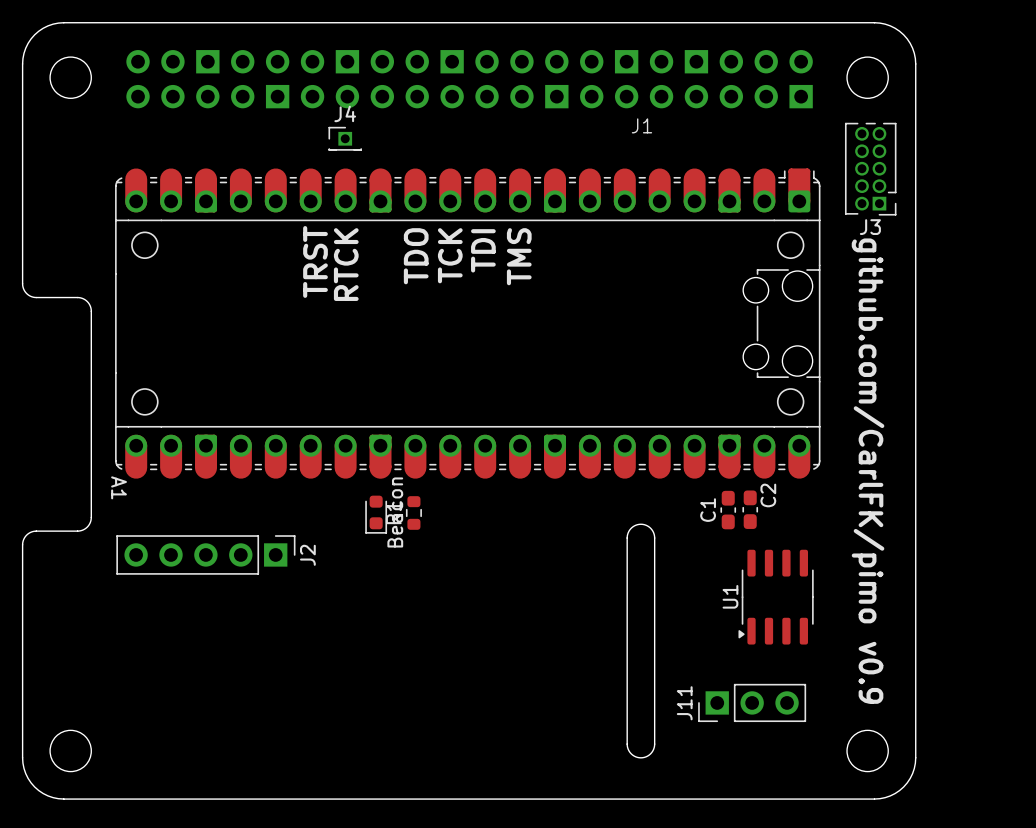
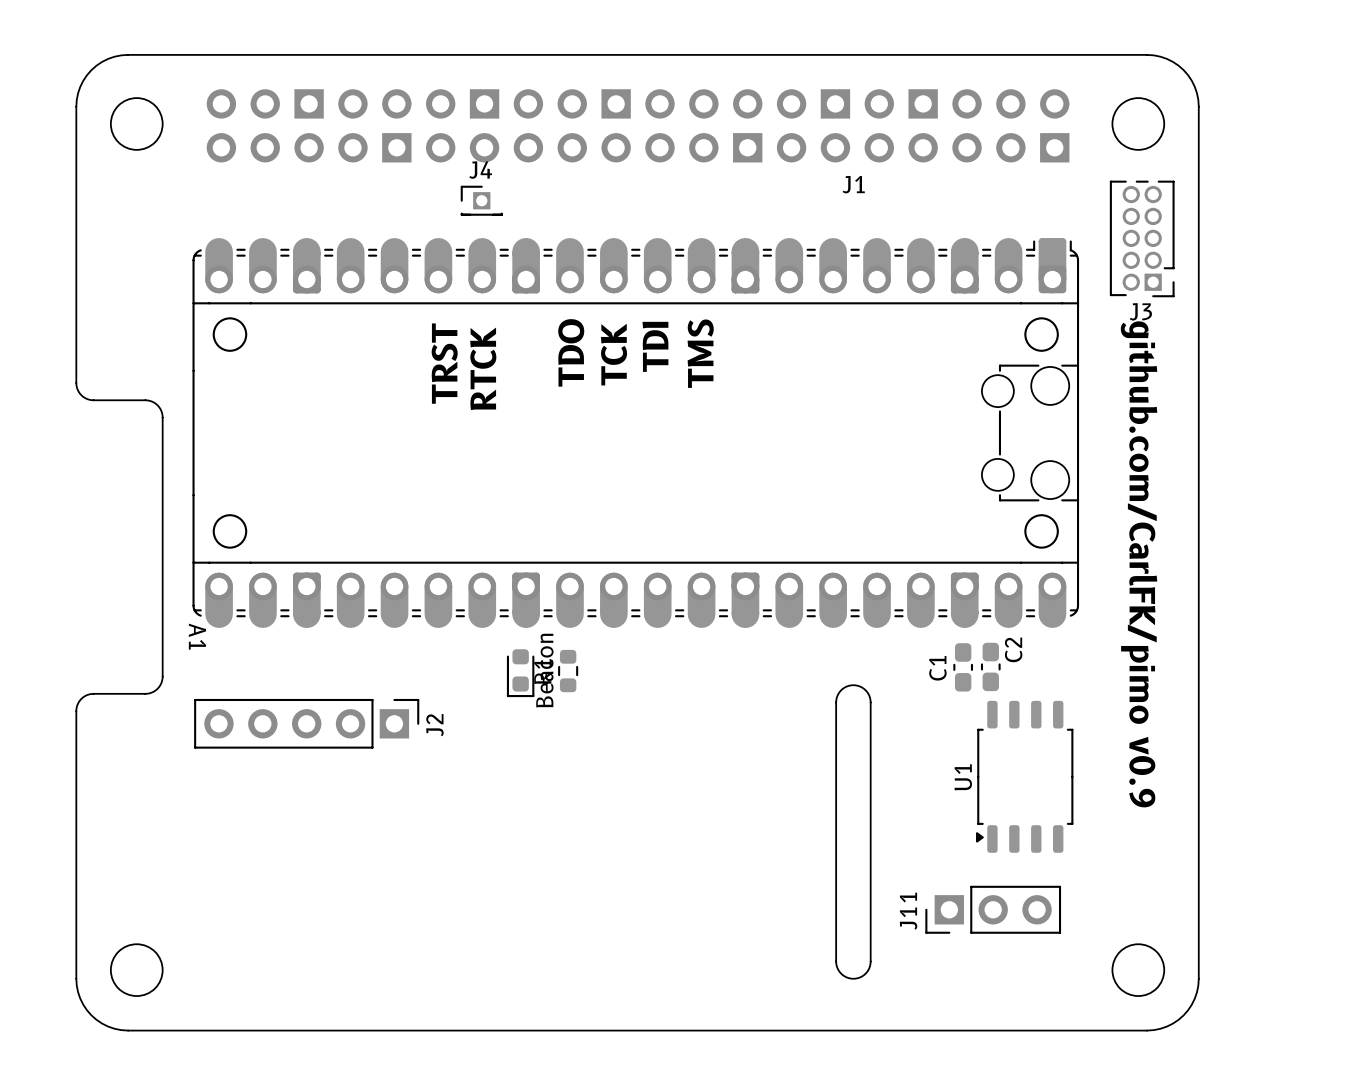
U1 footprint: [738, 549, 814, 645] -> [976, 700, 1074, 853]

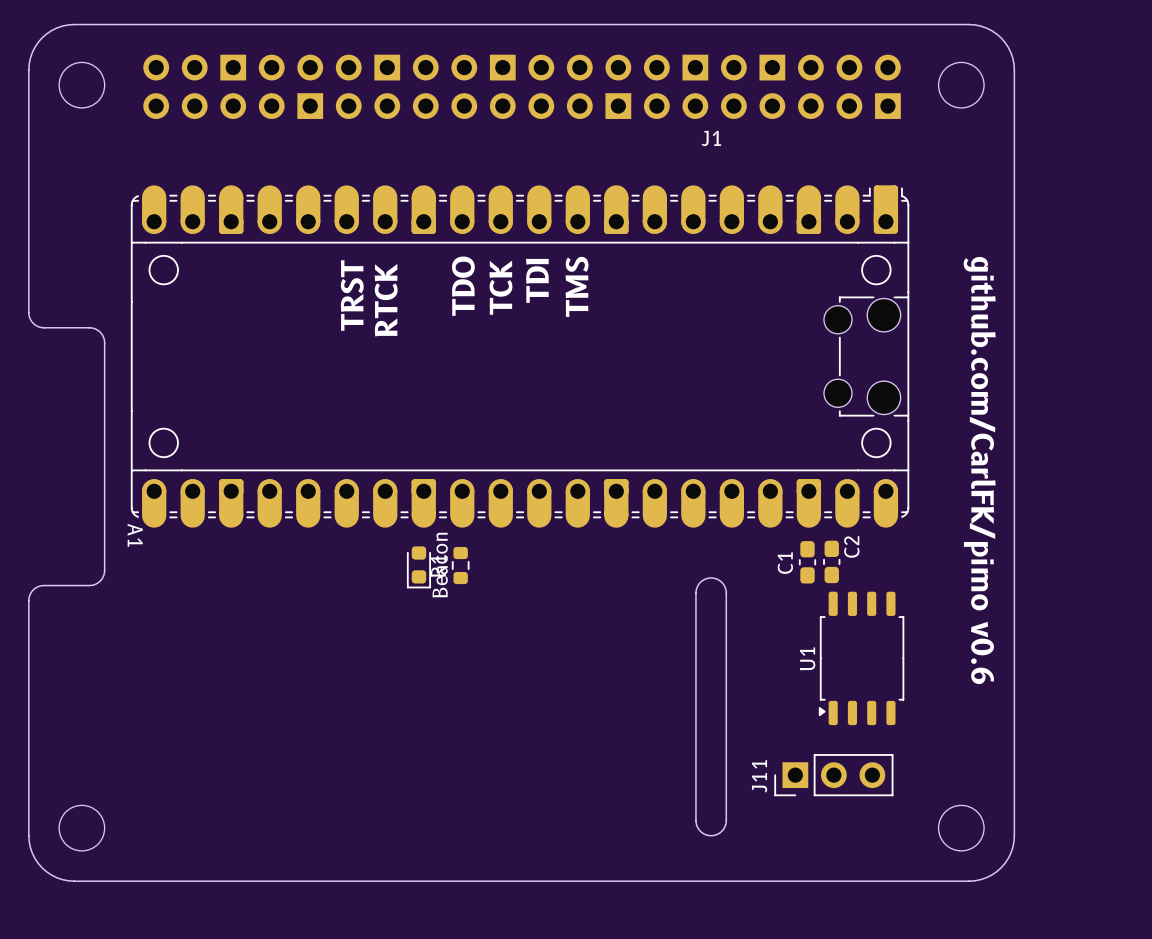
J4: (481, 200) -> none
J3: (1142, 238) -> none
text: github.com/CarlFK/pimo v0.9 (1139, 564) -> github.com/CarlFK/pimo v0.6 (979, 470)
J2: (306, 723) -> none

